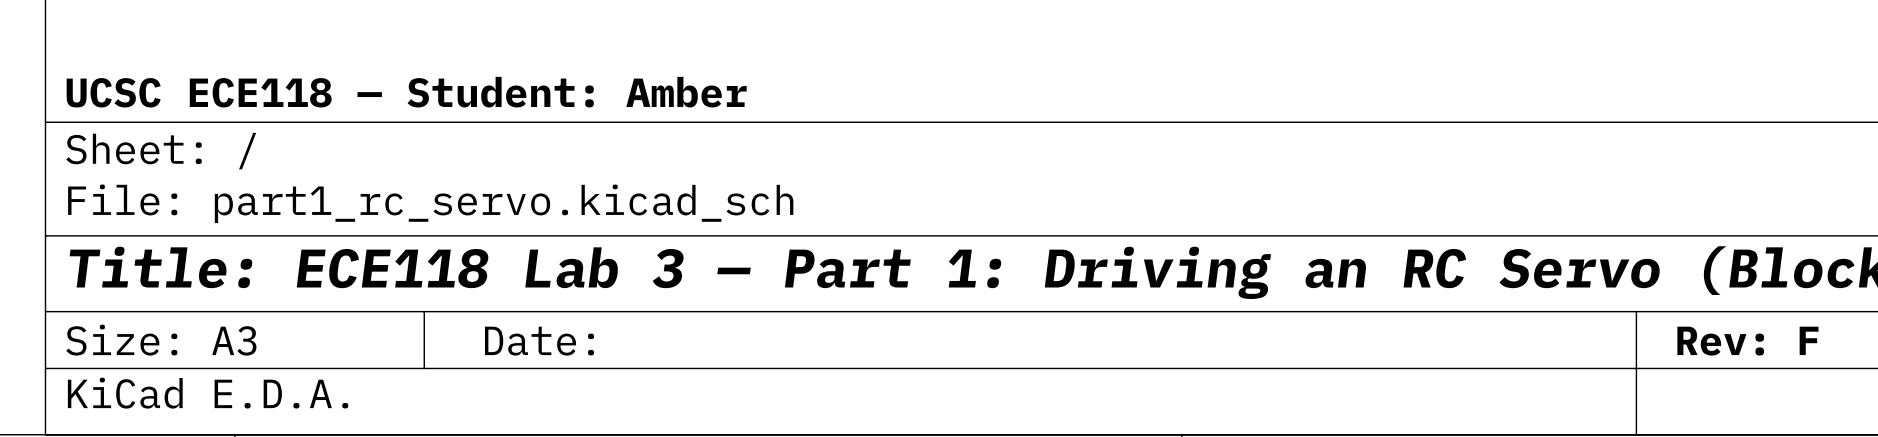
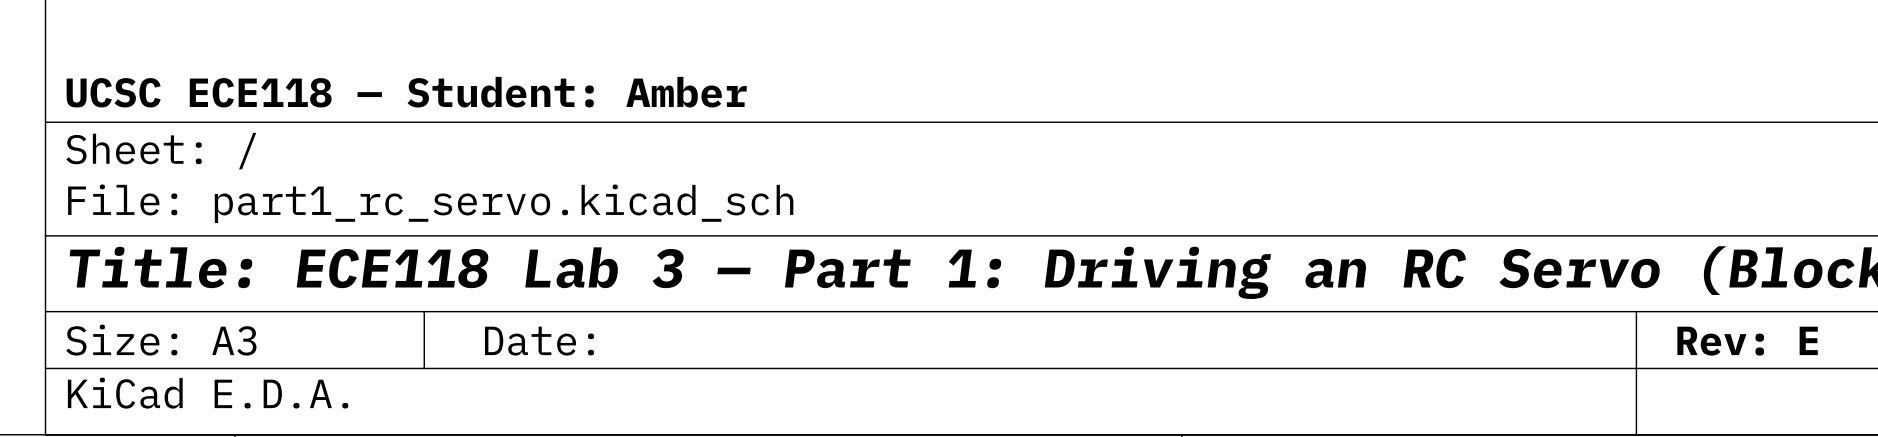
title block: Rev: F (1747, 341) -> Rev: E (1747, 341)

